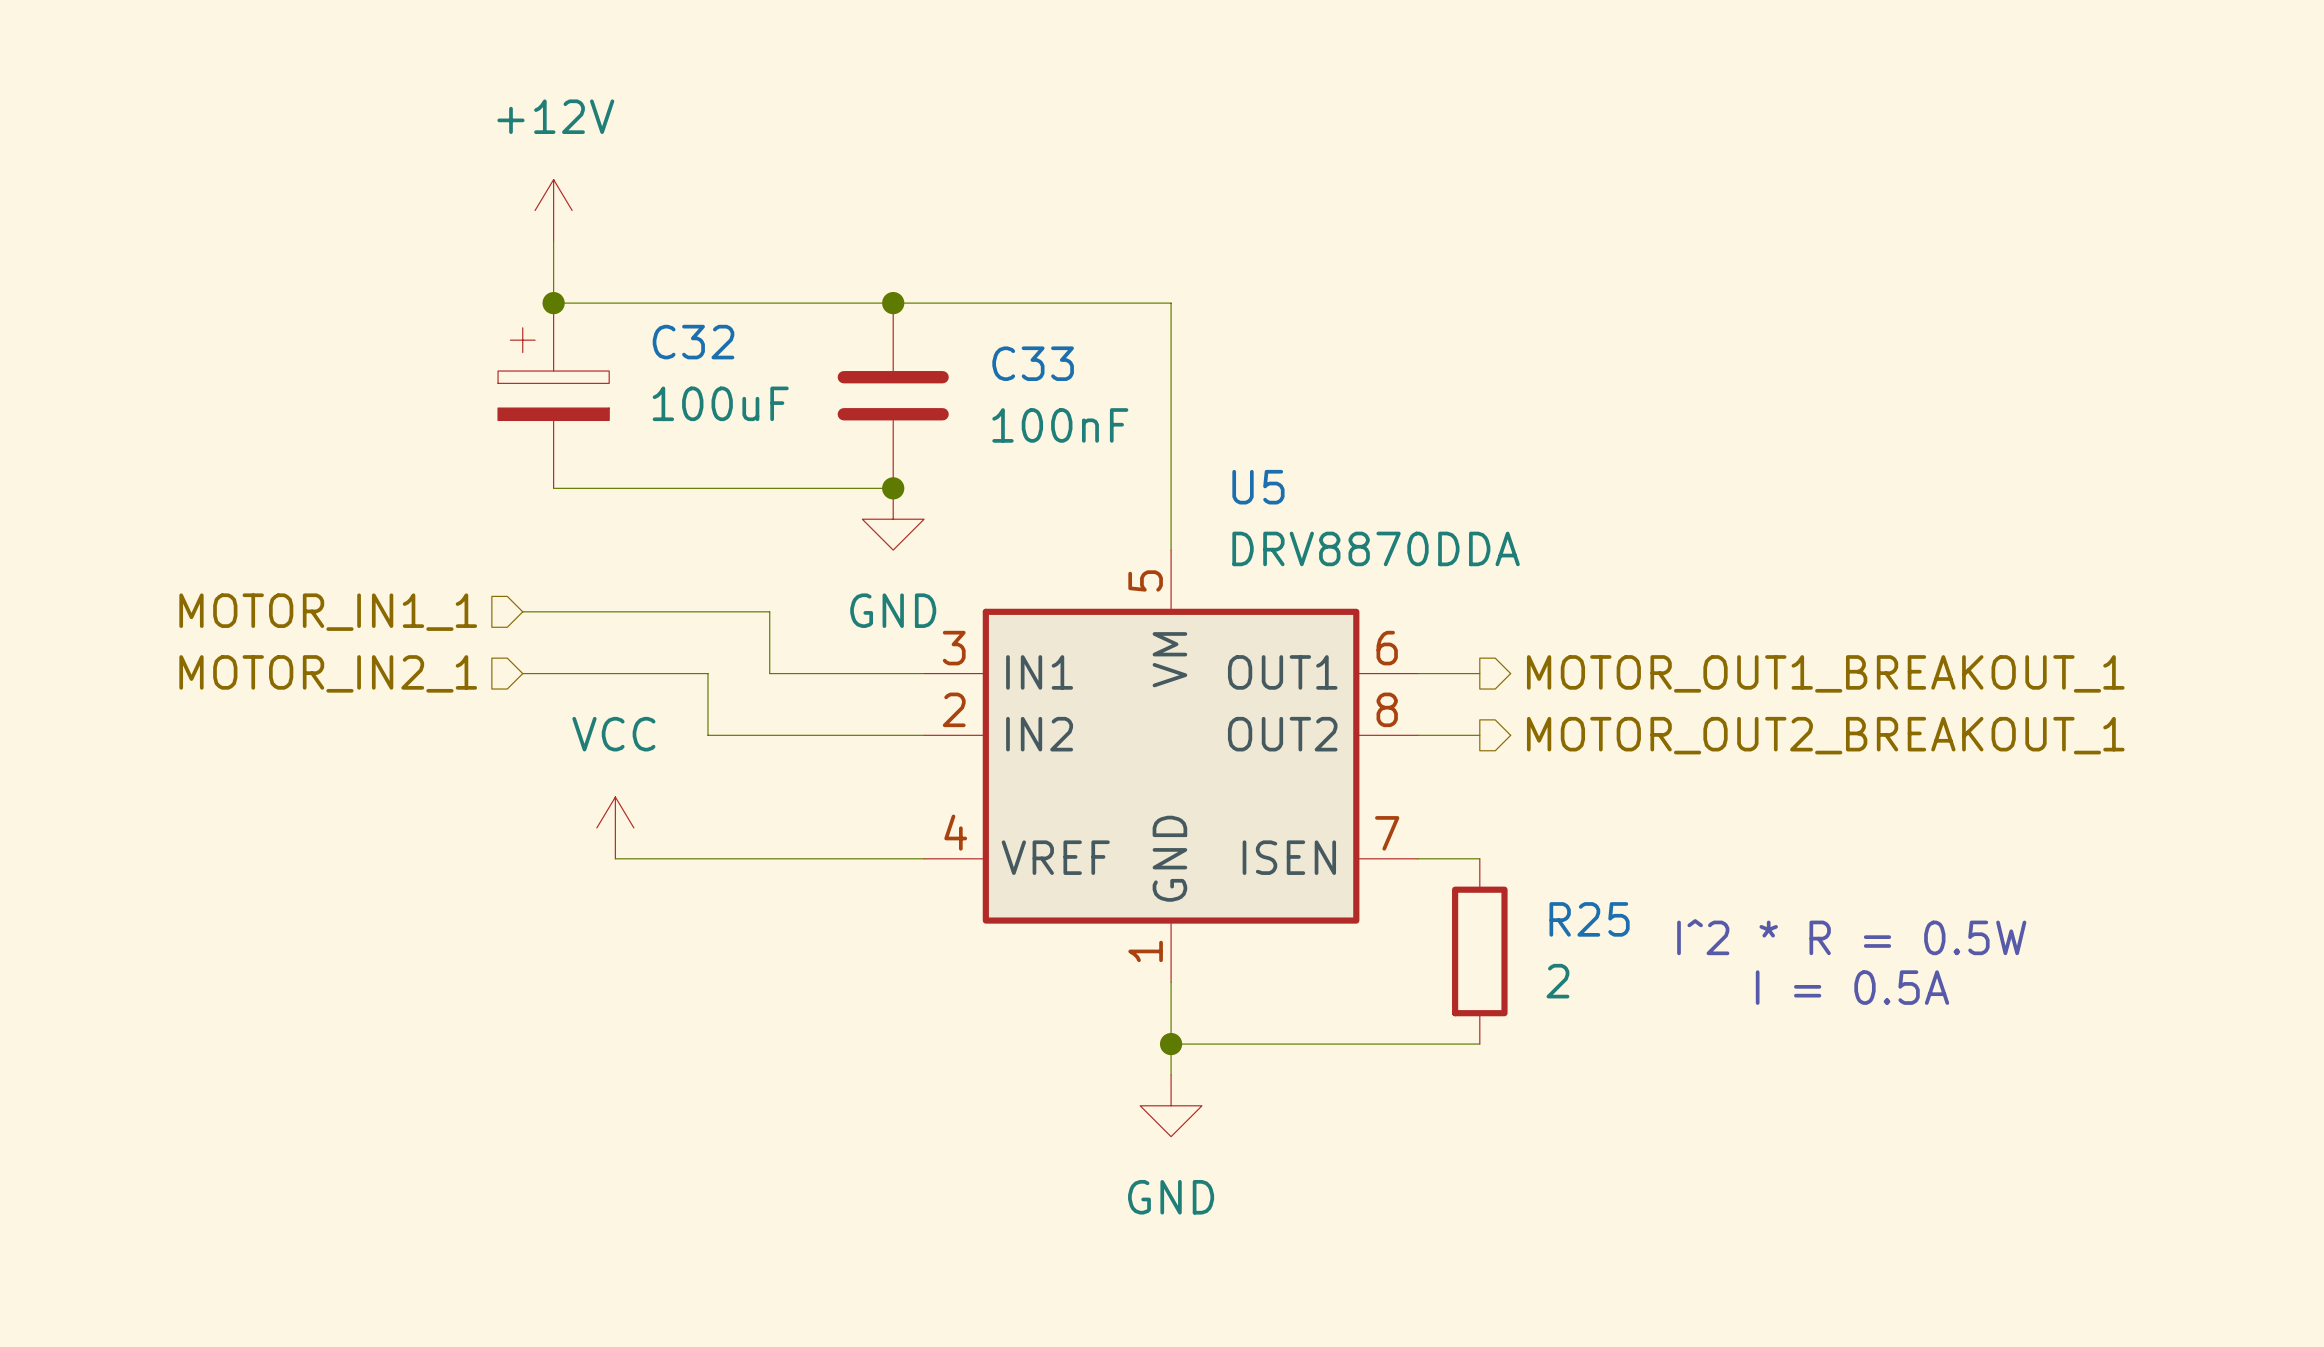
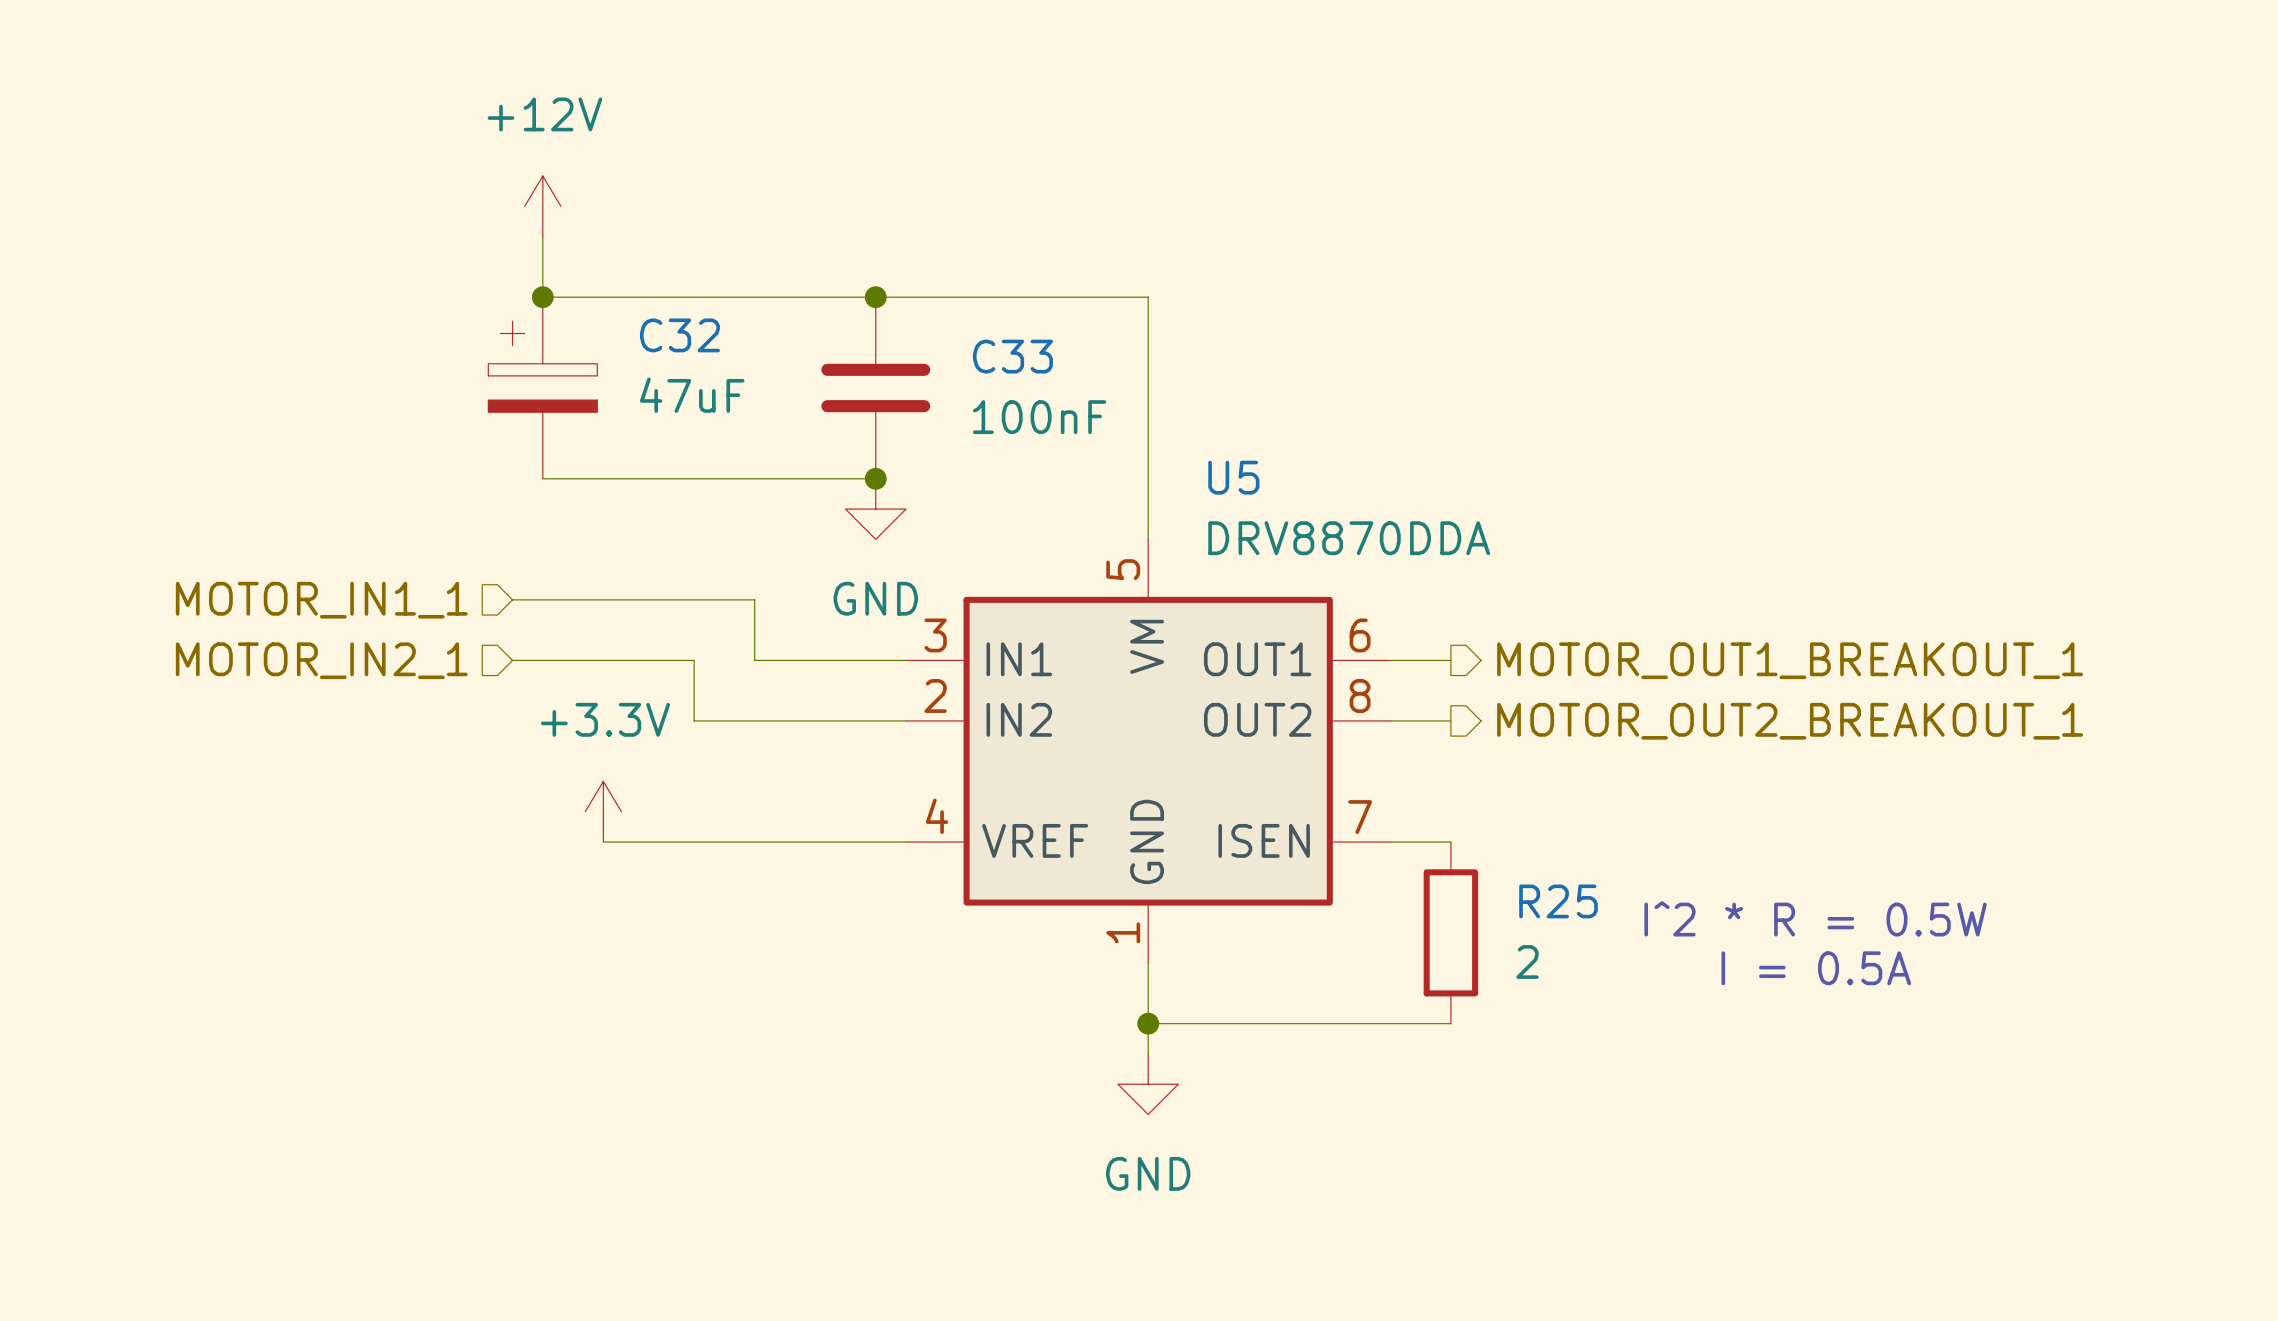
C32 value: 100uF (720, 403) -> 47uF (692, 395)
power symbol: VCC (615, 827) -> +3.3V (603, 811)

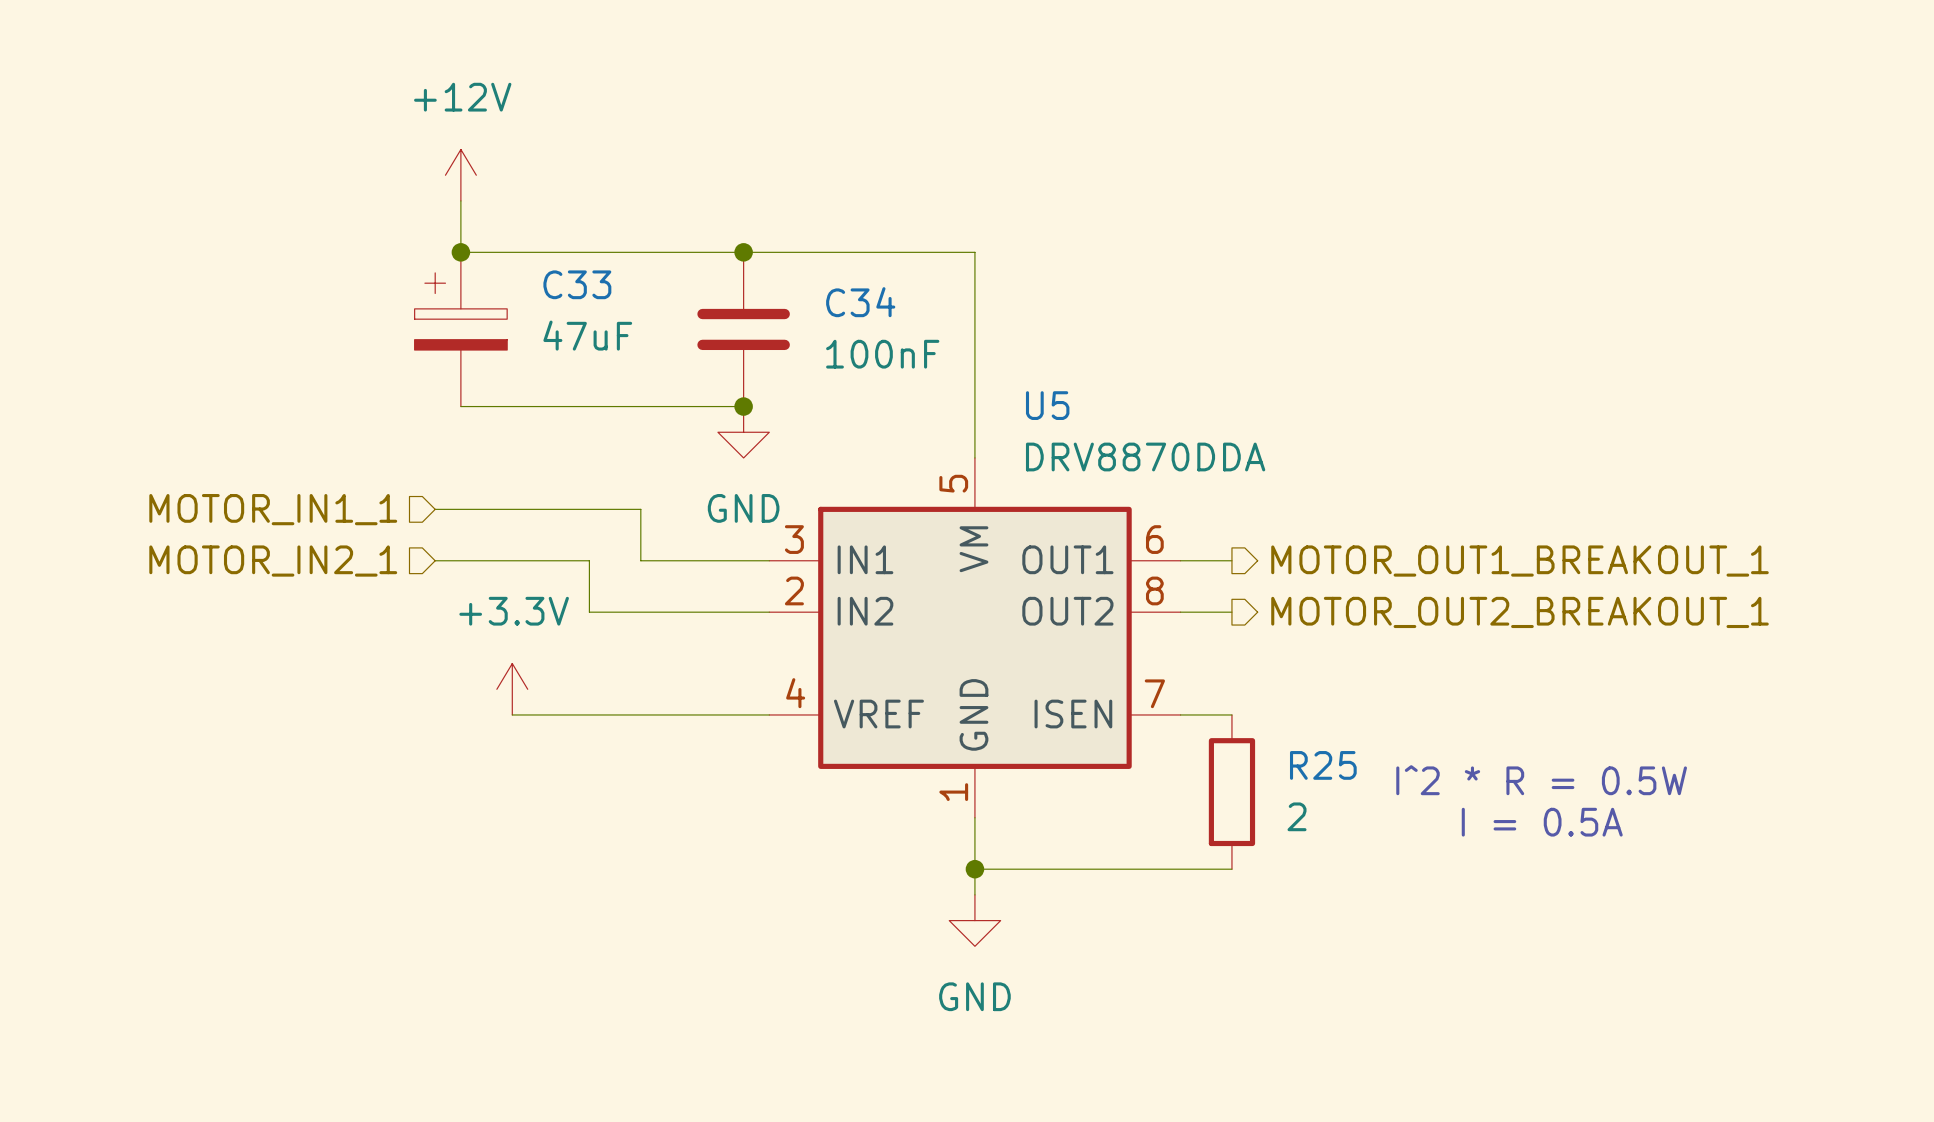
C32 name: C32 (679, 335) -> C33 (577, 284)
C33 name: C33 (1012, 356) -> C34 (860, 302)

